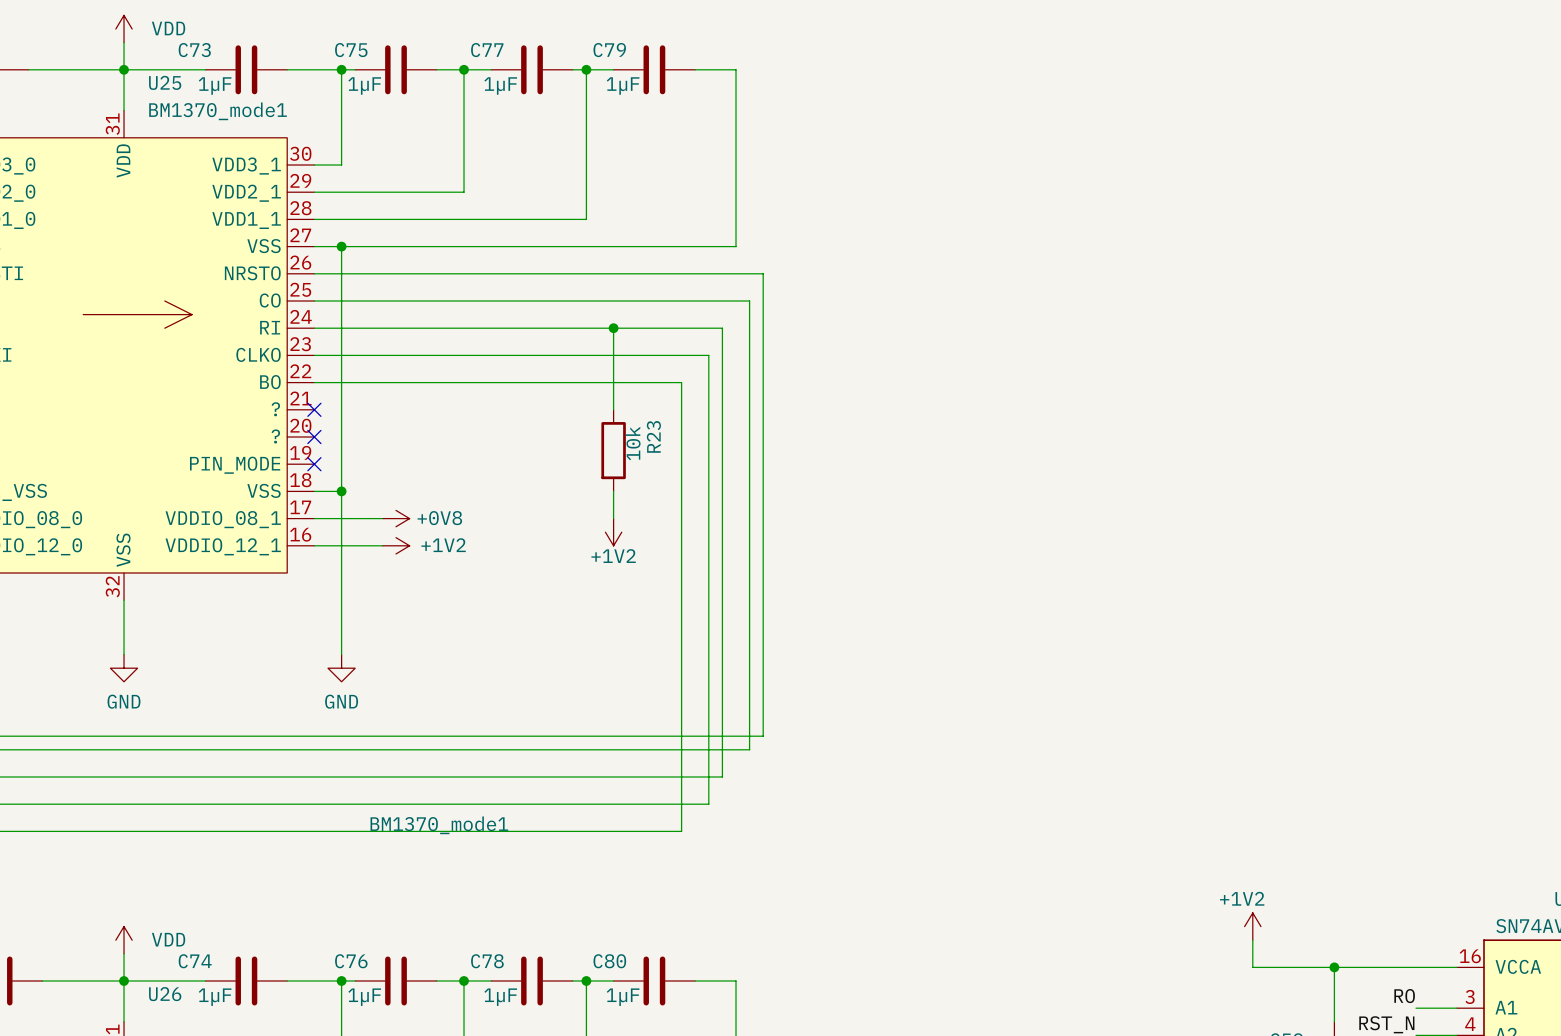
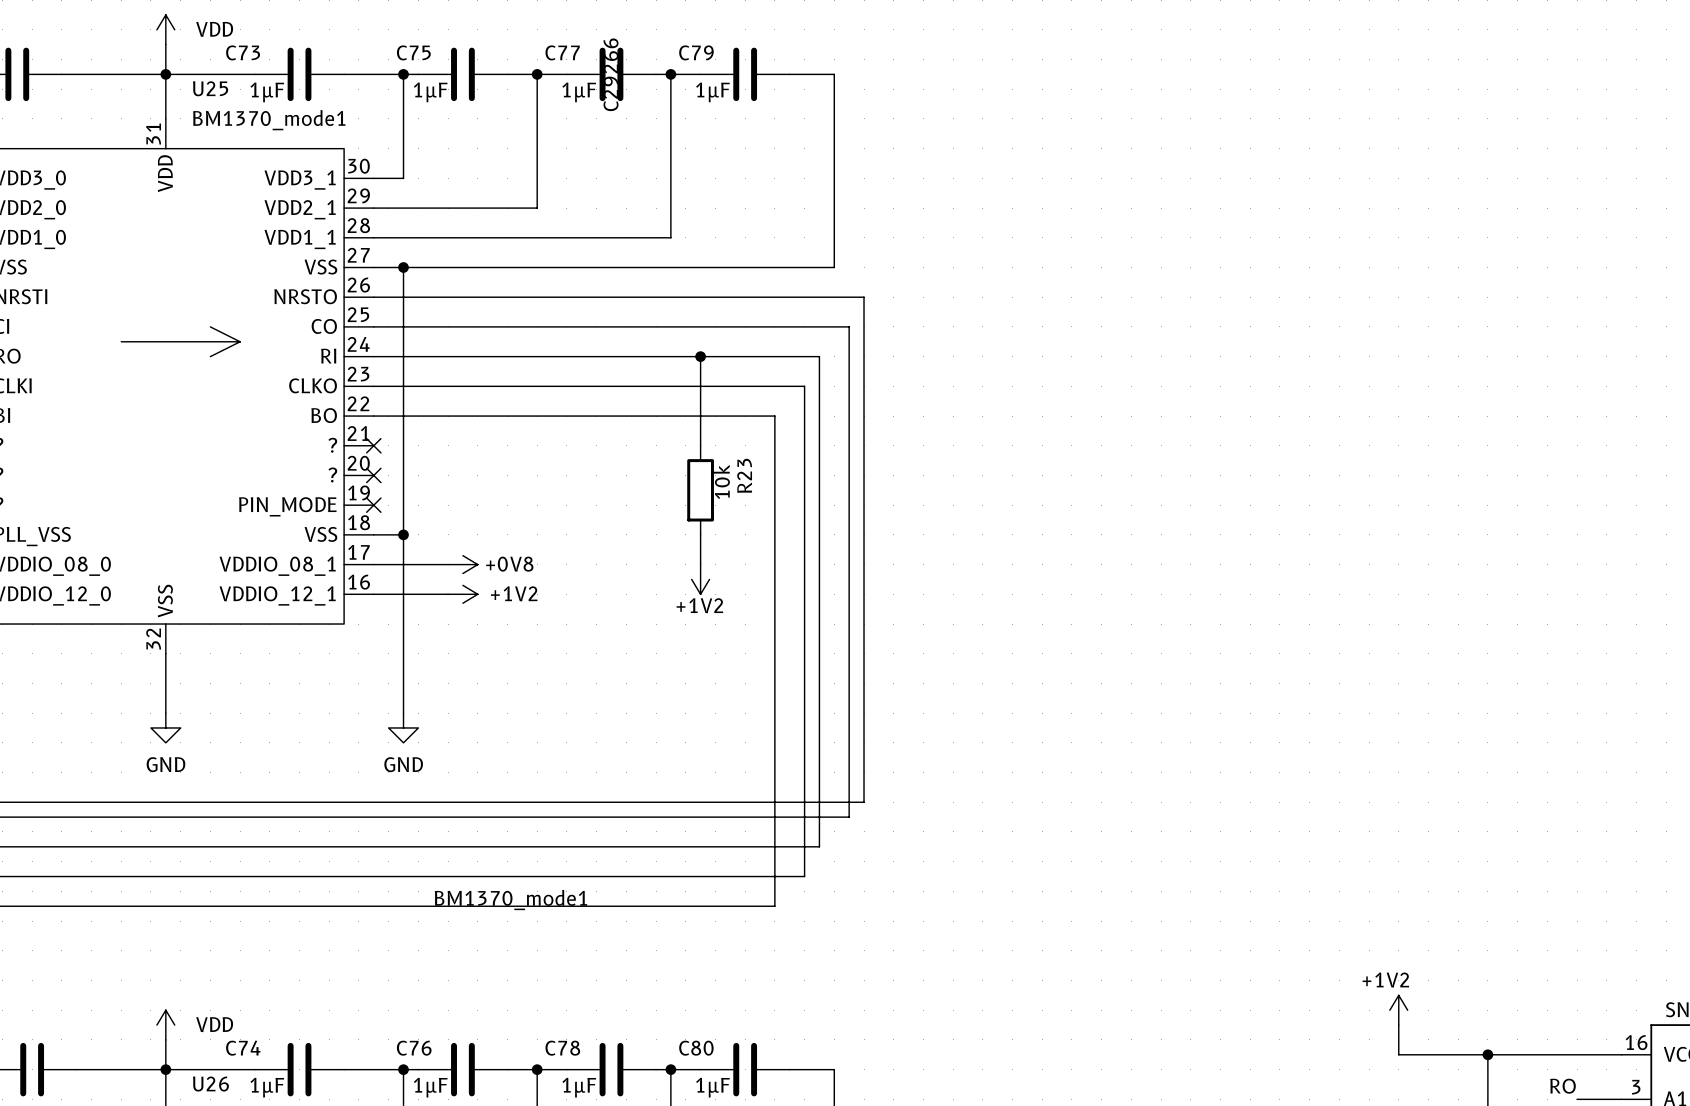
C77 text: none -> C29266 (611, 74)

